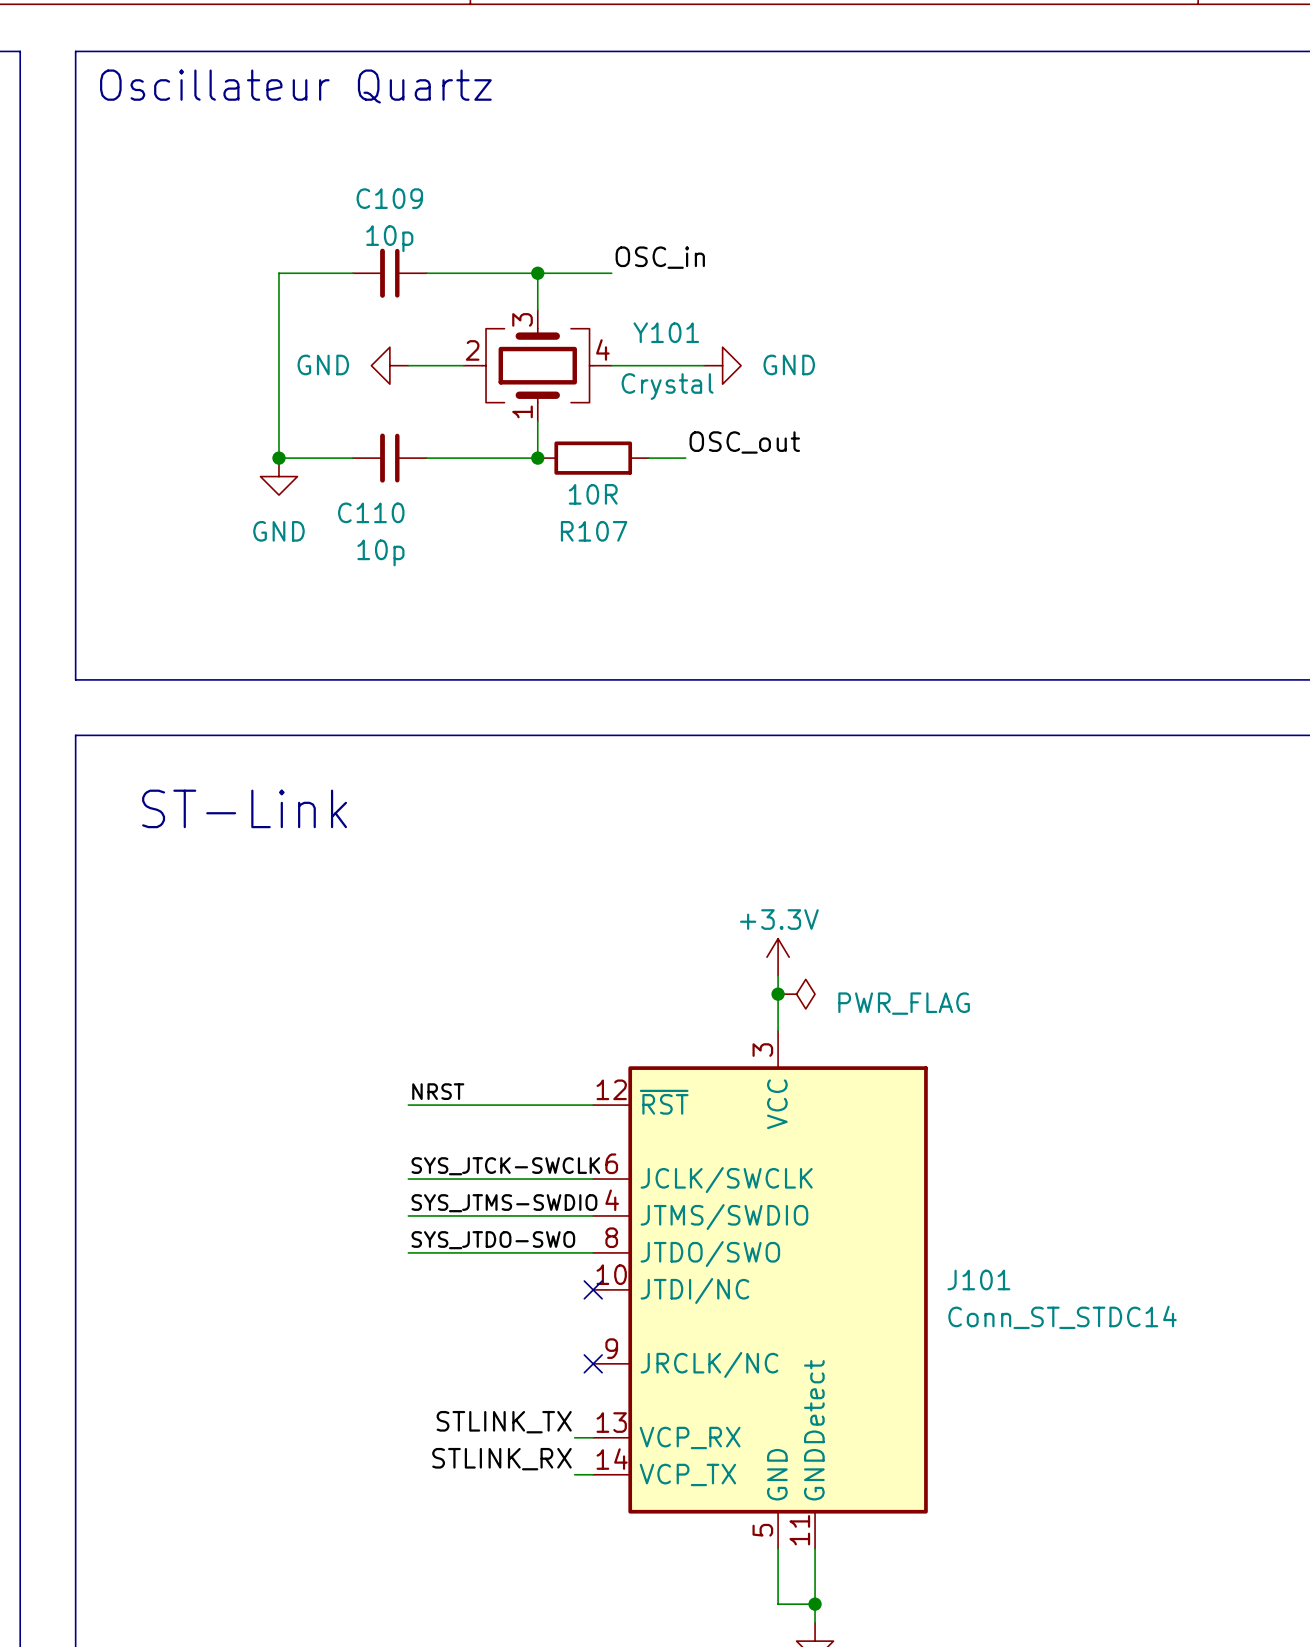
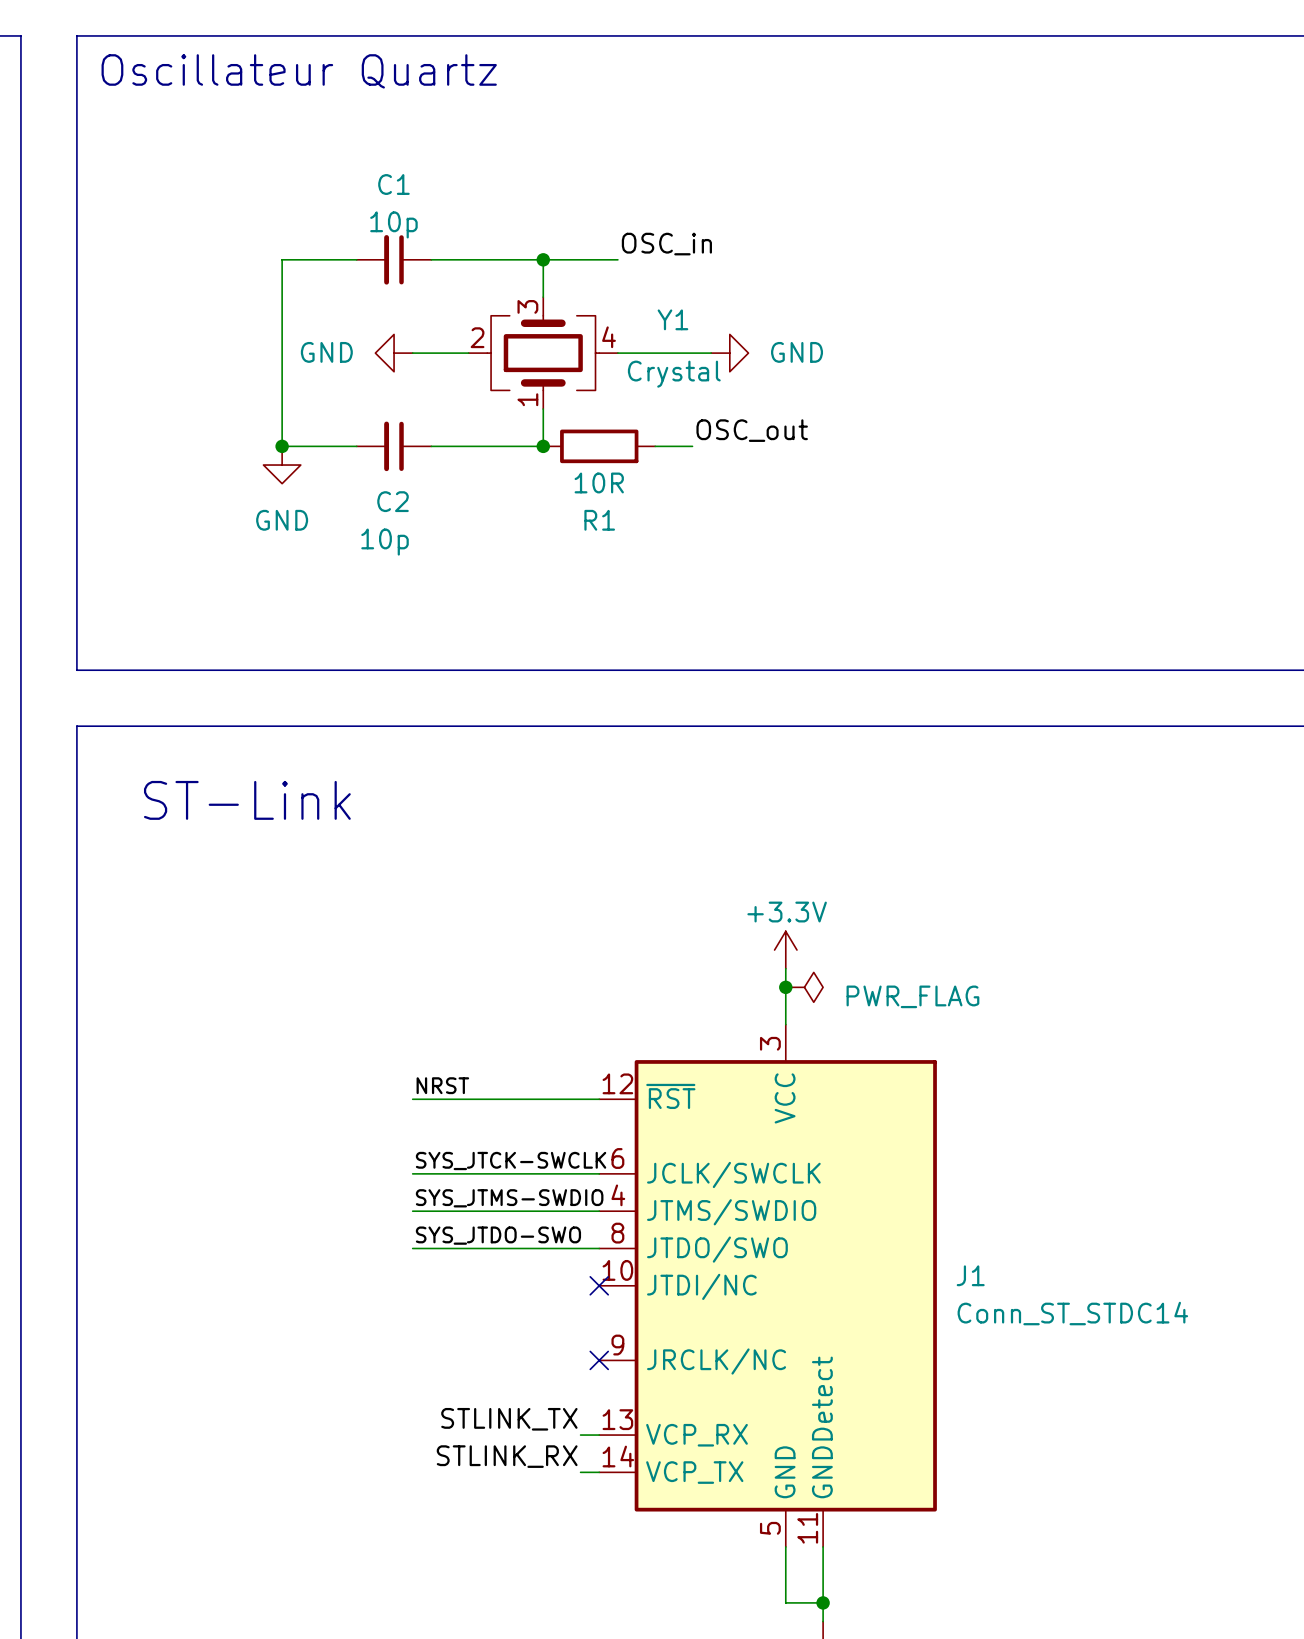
C109 name: C109 (389, 198) -> C1 (393, 184)
Y101 name: Y101 (666, 332) -> Y1 (672, 319)
C110 name: C110 (371, 512) -> C2 (393, 501)
R107 name: R107 (594, 531) -> R1 (599, 520)
J101 name: J101 (978, 1279) -> J1 (970, 1275)

